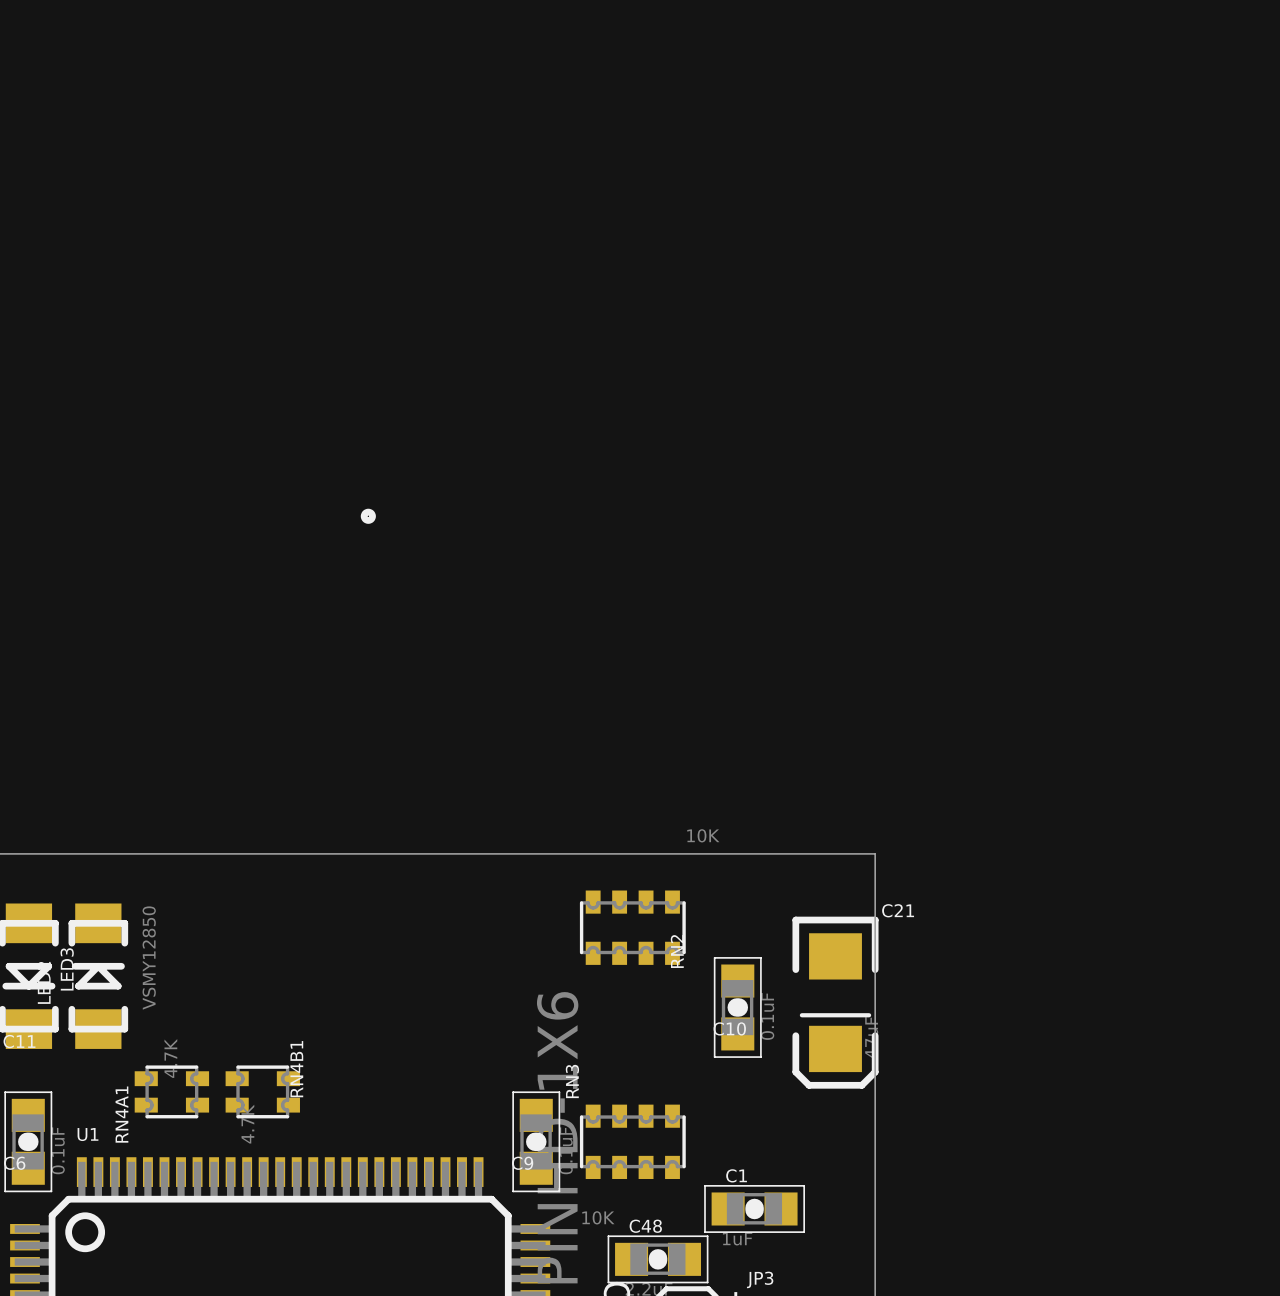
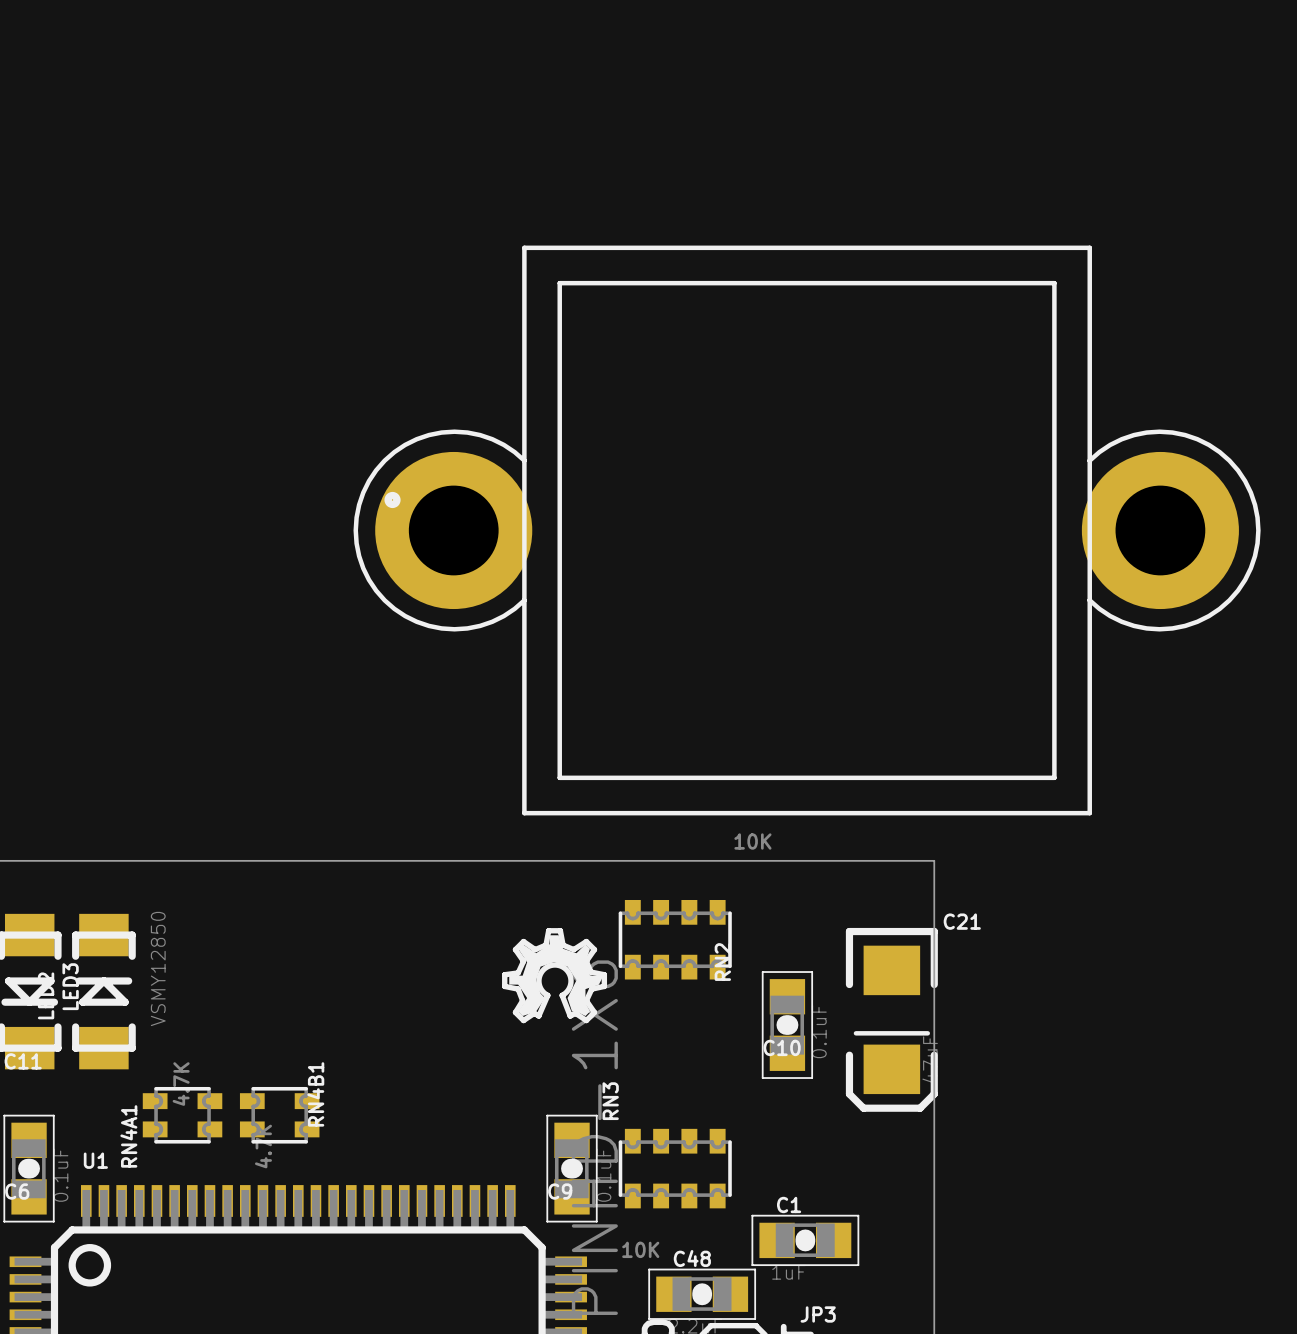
part: none -> (807, 530)
drawing: none -> [502, 928, 608, 1024]

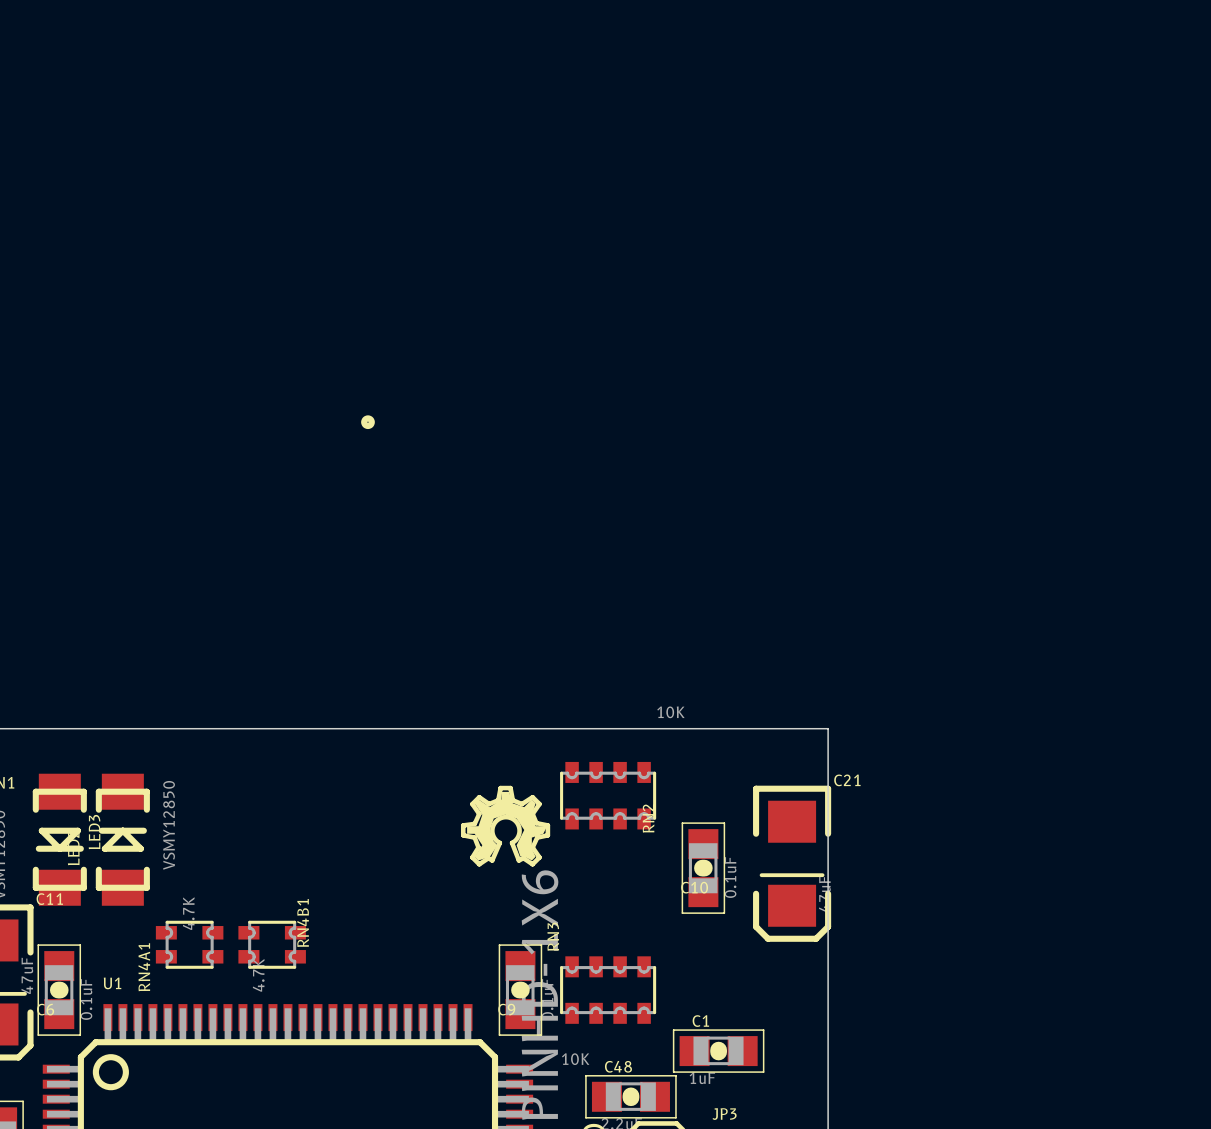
part: (807, 530) -> none

